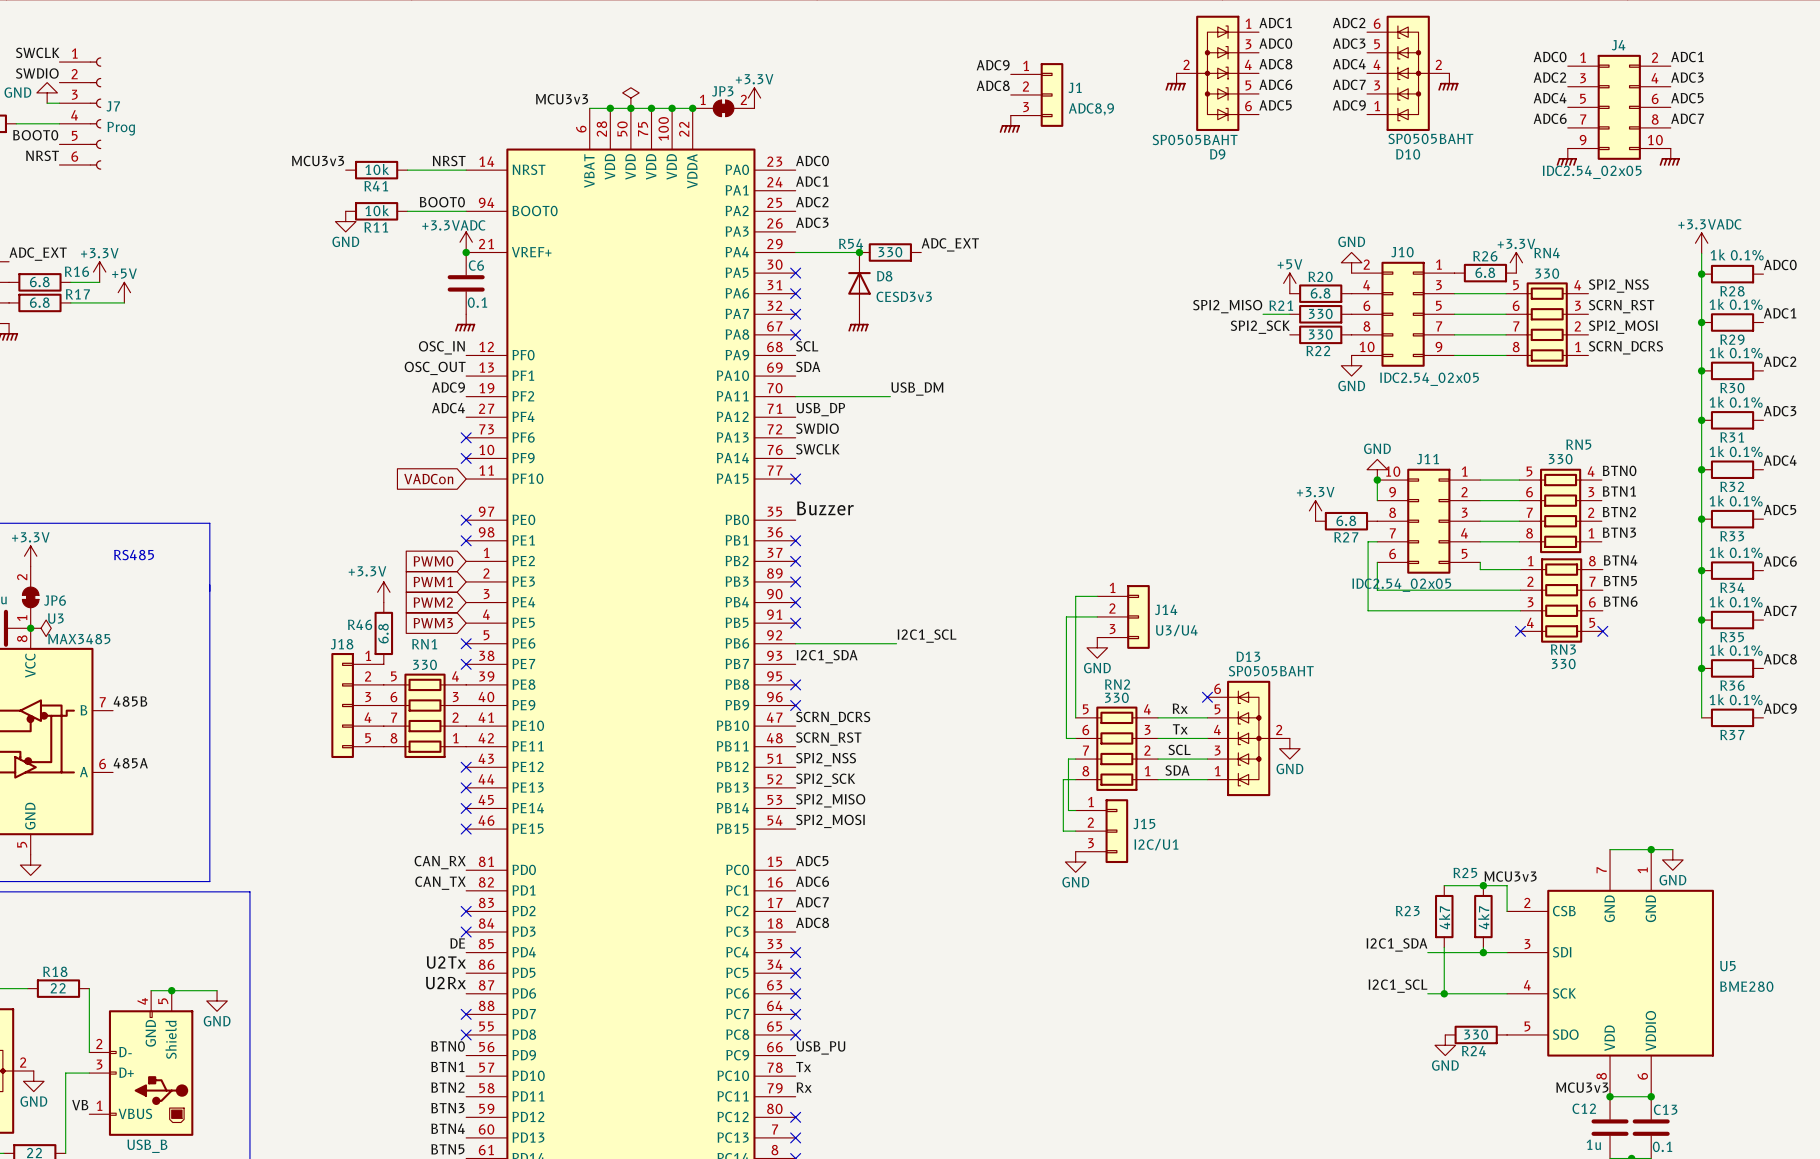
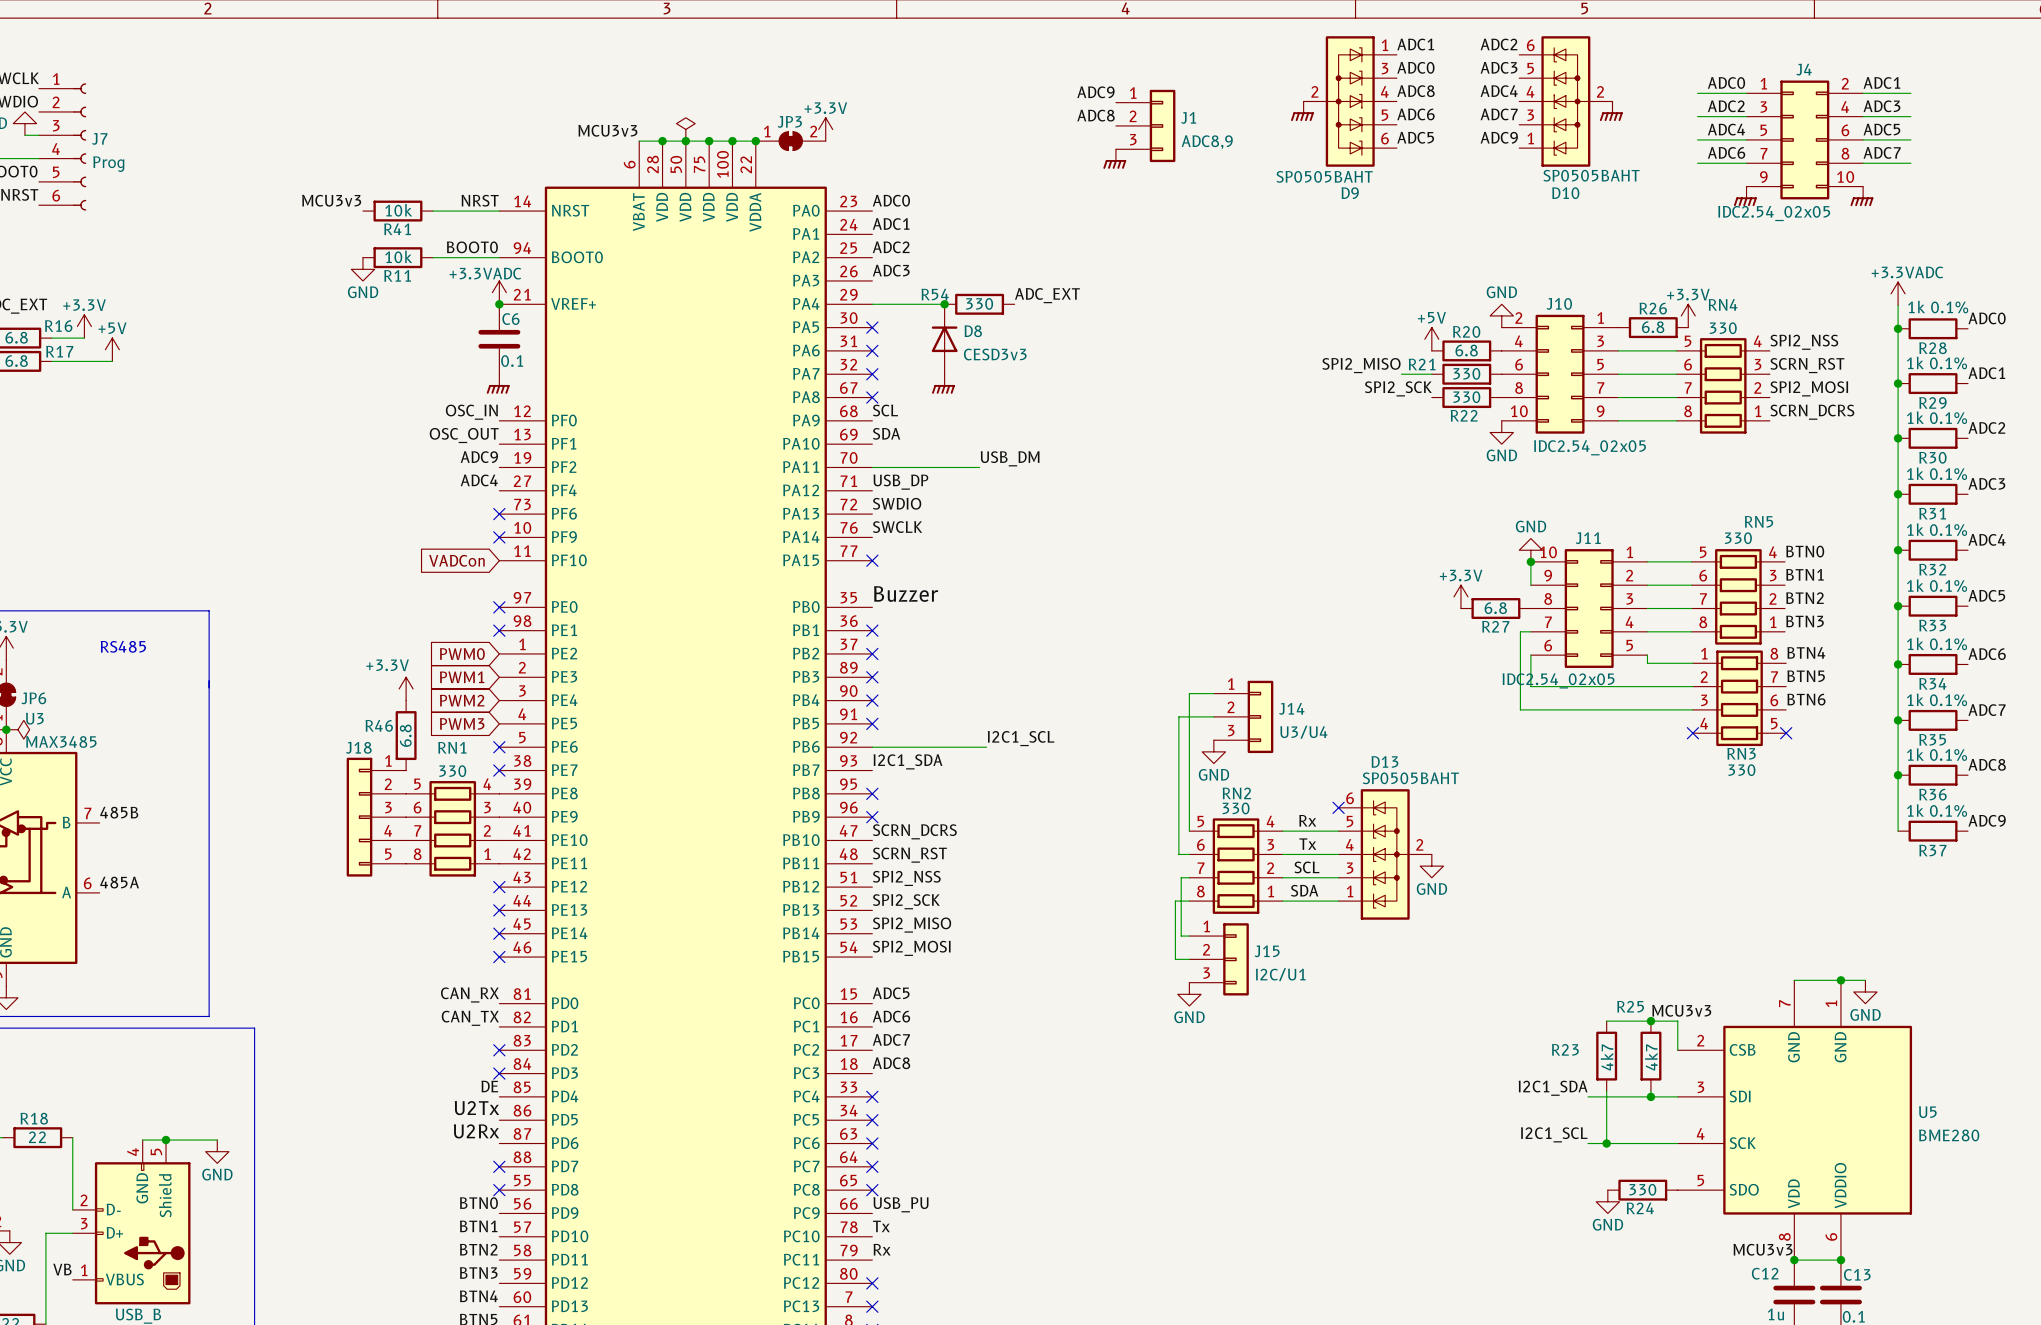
wire: none -> (1697, 93) (1746, 93)
wire: none -> (1863, 93) (1910, 93)
wire: none -> (1697, 116) (1746, 116)
wire: none -> (1863, 116) (1910, 116)
wire: none -> (1697, 139) (1746, 139)
wire: none -> (1863, 139) (1910, 139)
wire: none -> (1697, 163) (1746, 163)
wire: none -> (1863, 163) (1910, 163)

